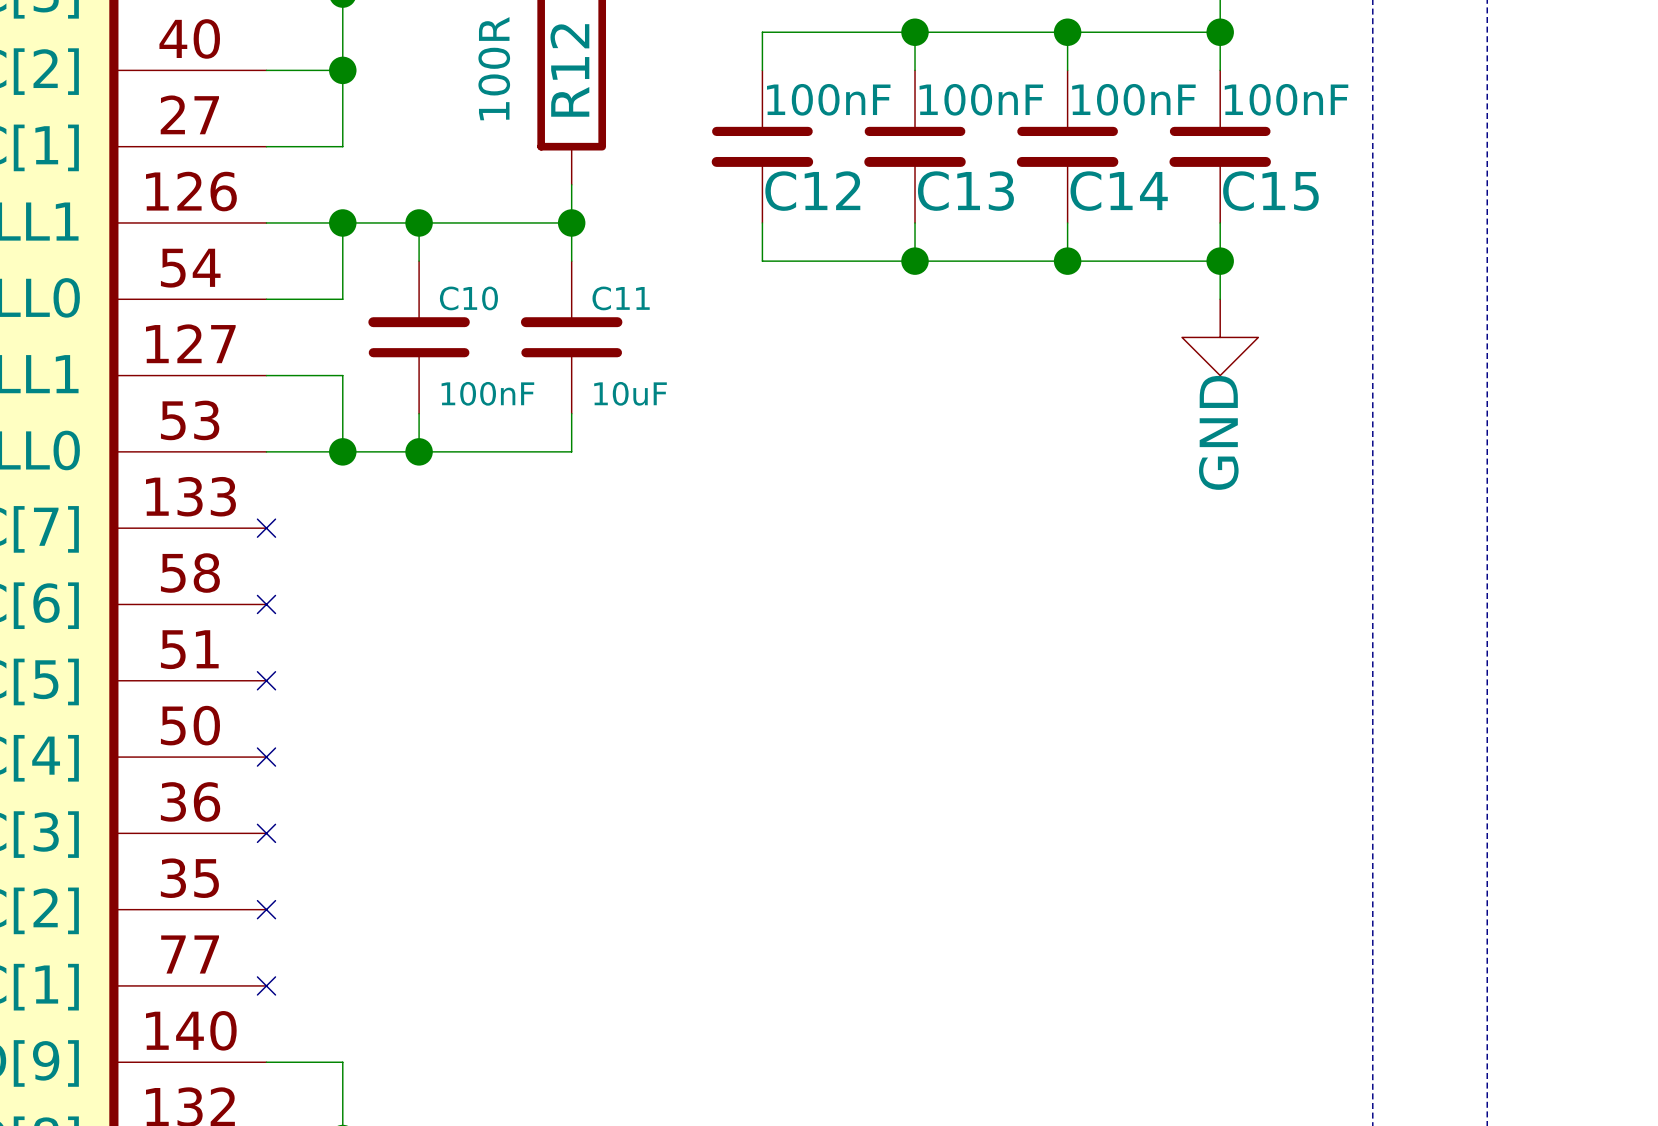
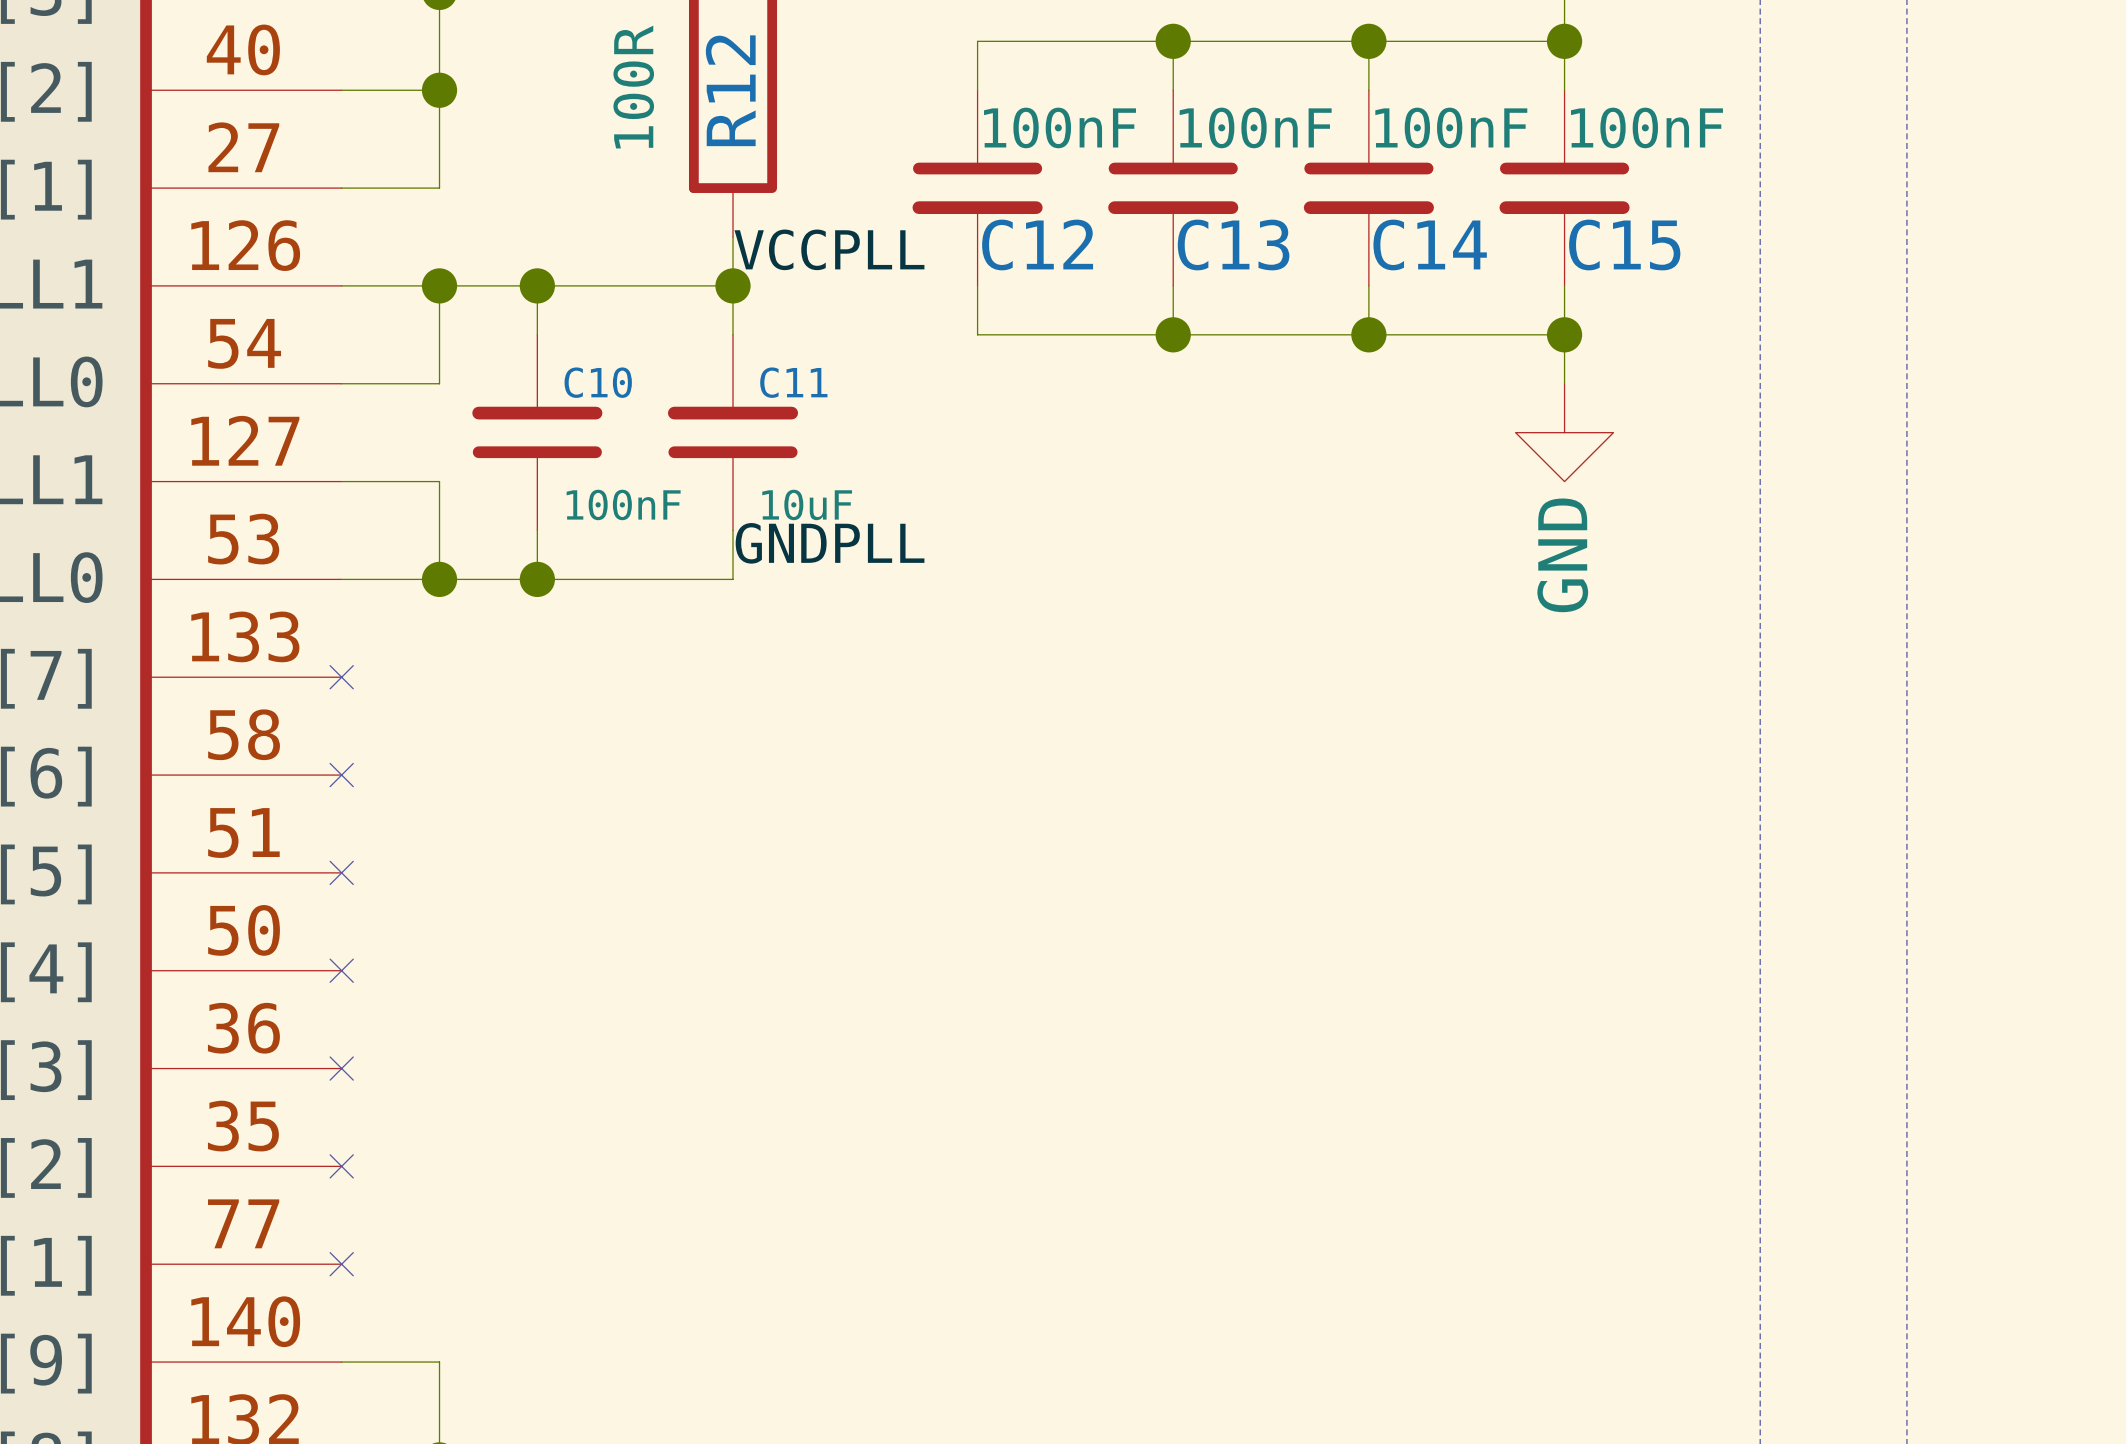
label: none -> VCCPLL (829, 249)
label: none -> GNDPLL (830, 543)

